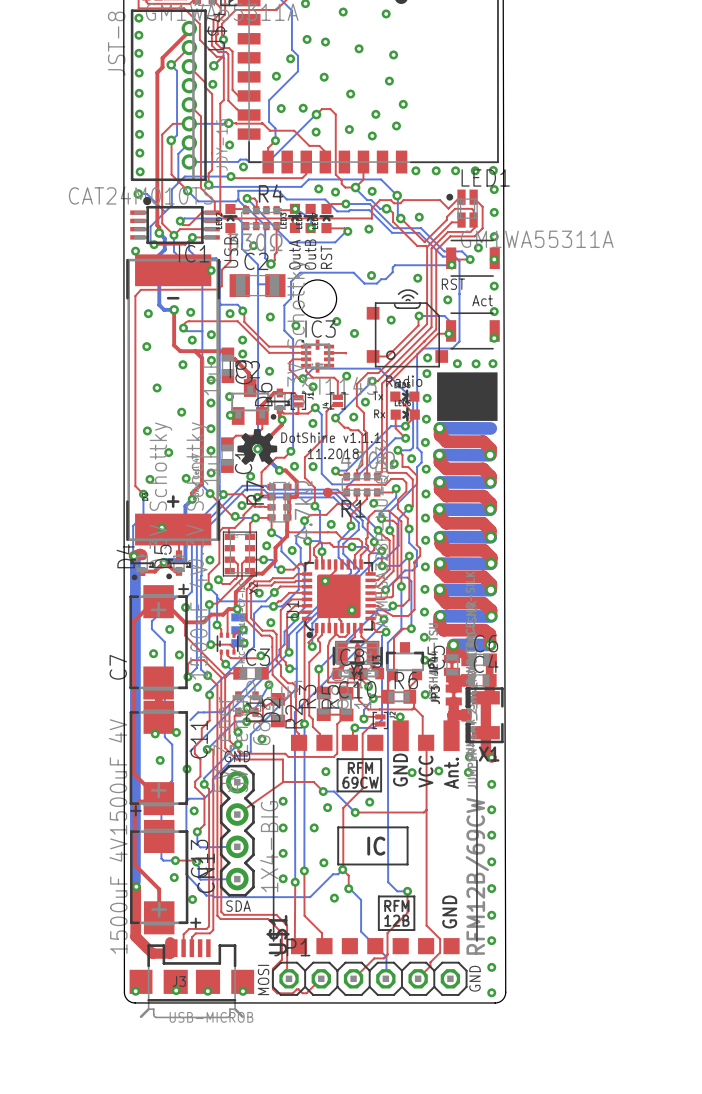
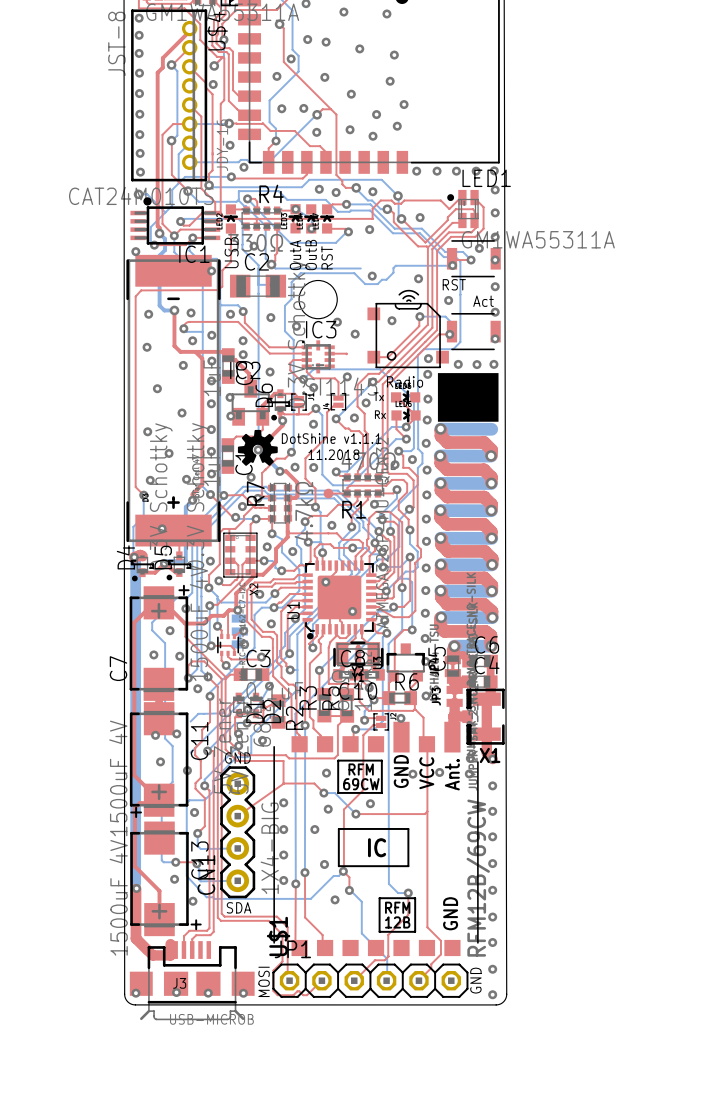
top track: none -> (279, 24) (283, 28) (283, 62) (331, 109)
via: none -> (279, 24)
top track: (363, 162) (363, 179) (355, 187) -> none
bottom track: none -> (271, 264) (275, 268) (360, 268)

